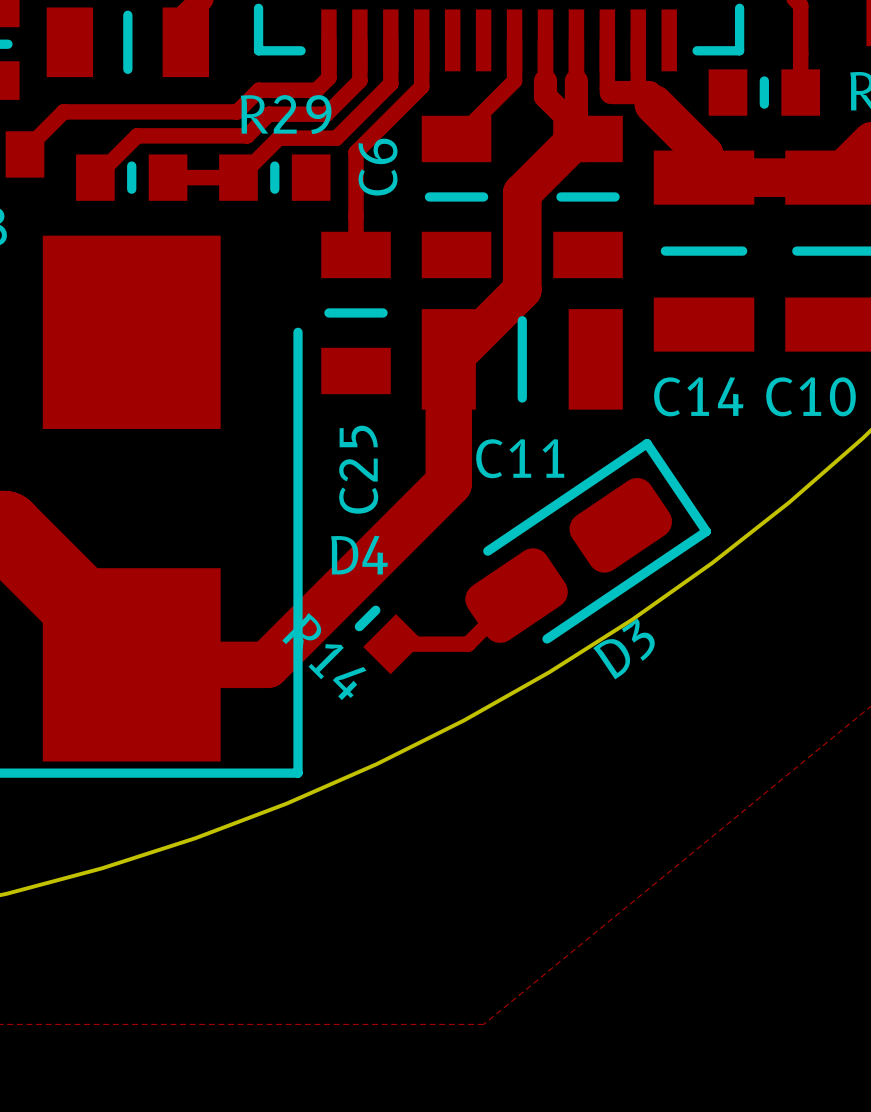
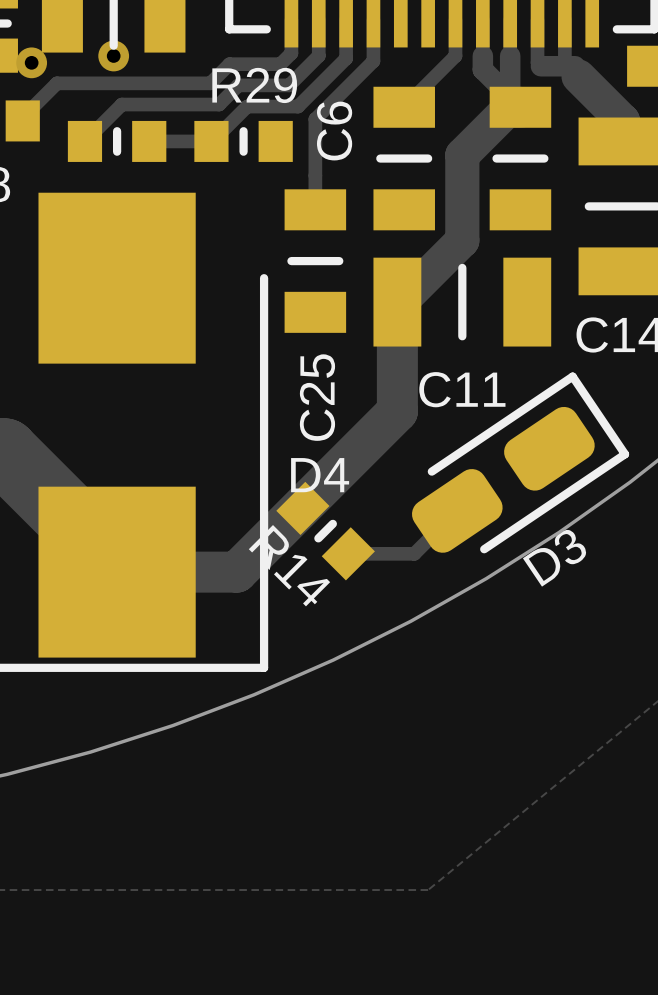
via: none -> (113, 55)
via: none -> (31, 62)

